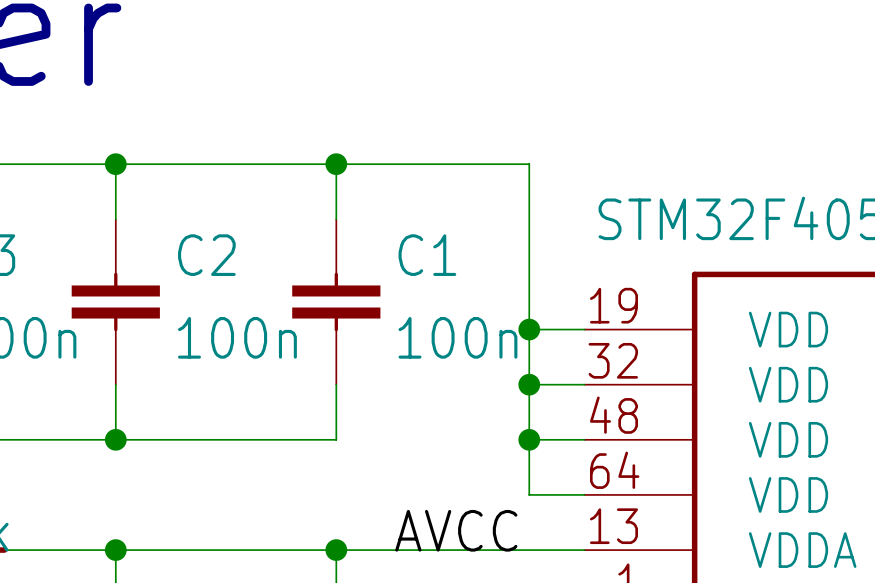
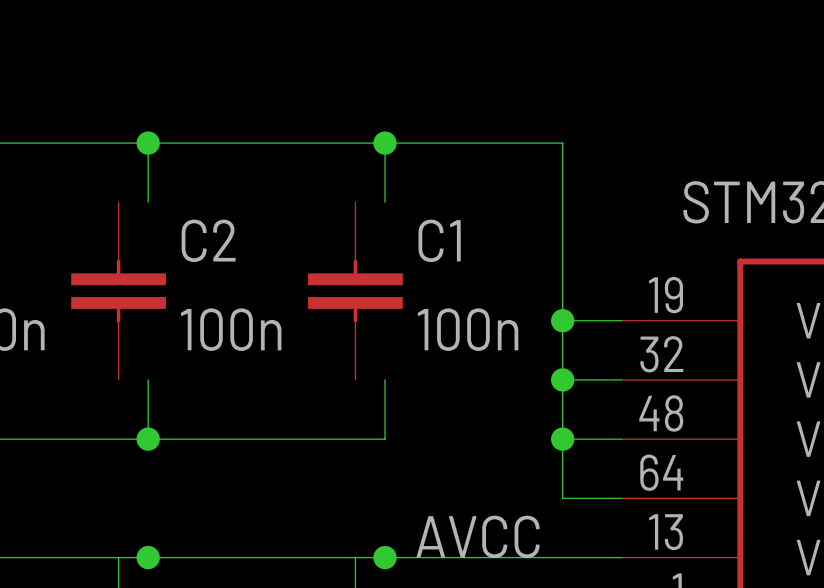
wire: (115, 164) (115, 219) -> (148, 143) (148, 202)
junction position: (115, 164) -> (148, 143)
wire: (336, 164) (336, 219) -> (385, 143) (385, 202)
junction position: (336, 164) -> (385, 143)
wire: (115, 384) (115, 439) -> (148, 379) (148, 439)
wire: (336, 384) (336, 439) -> (385, 379) (385, 439) (355, 439)
junction position: (115, 439) -> (148, 439)
junction position: (115, 550) -> (148, 557)
junction position: (336, 550) -> (385, 557)

